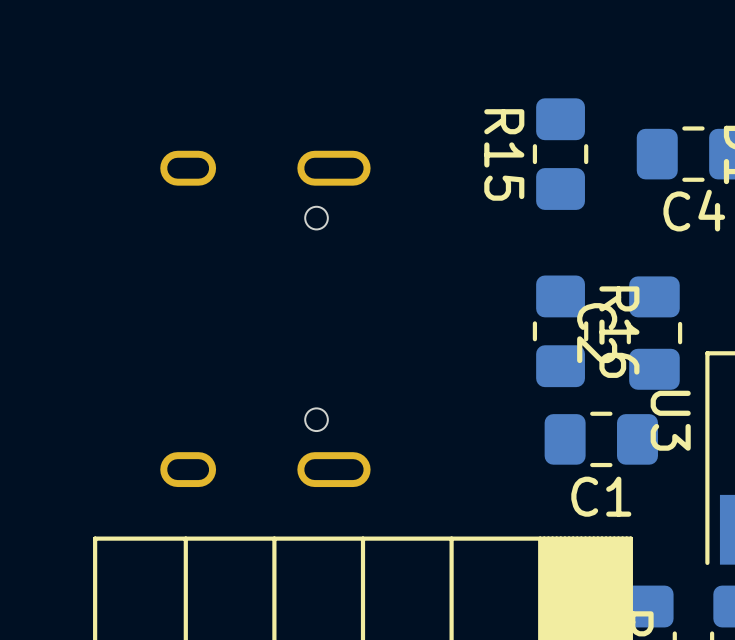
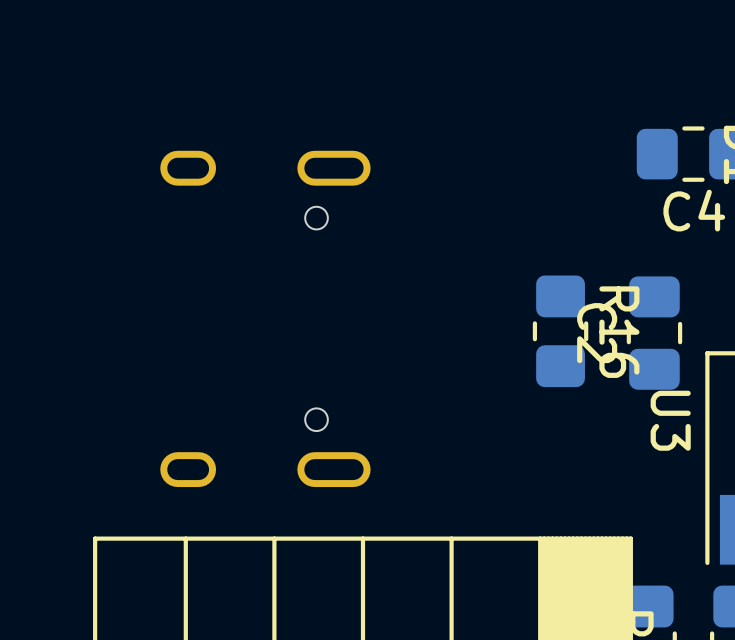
R15: (560, 154) -> none
C1: (601, 439) -> none

